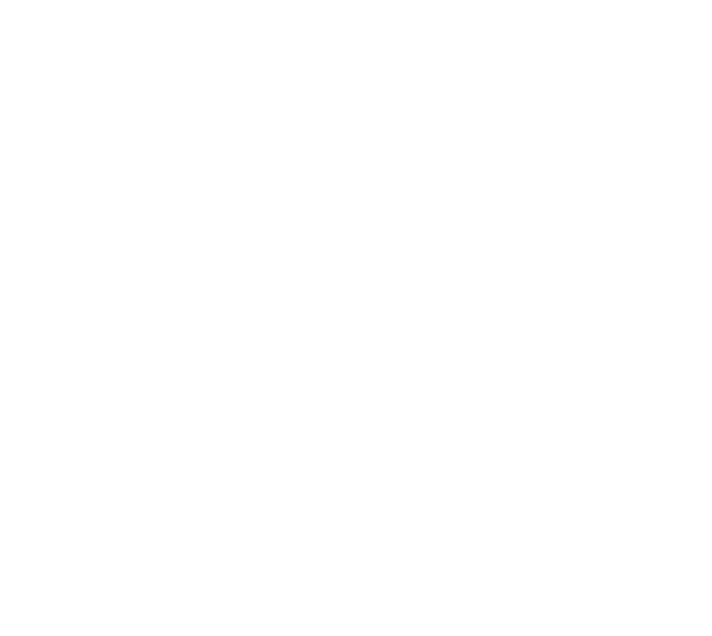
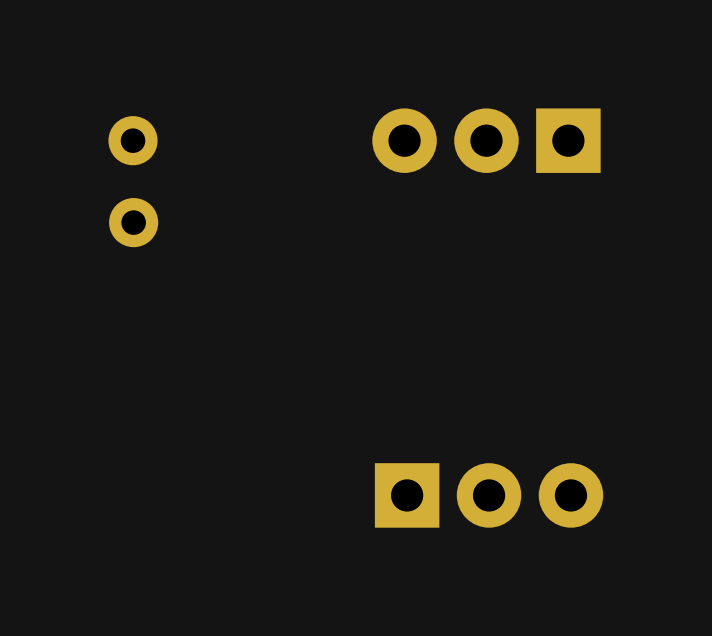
part: none -> (486, 140)
part: none -> (133, 181)
part: none -> (489, 495)

